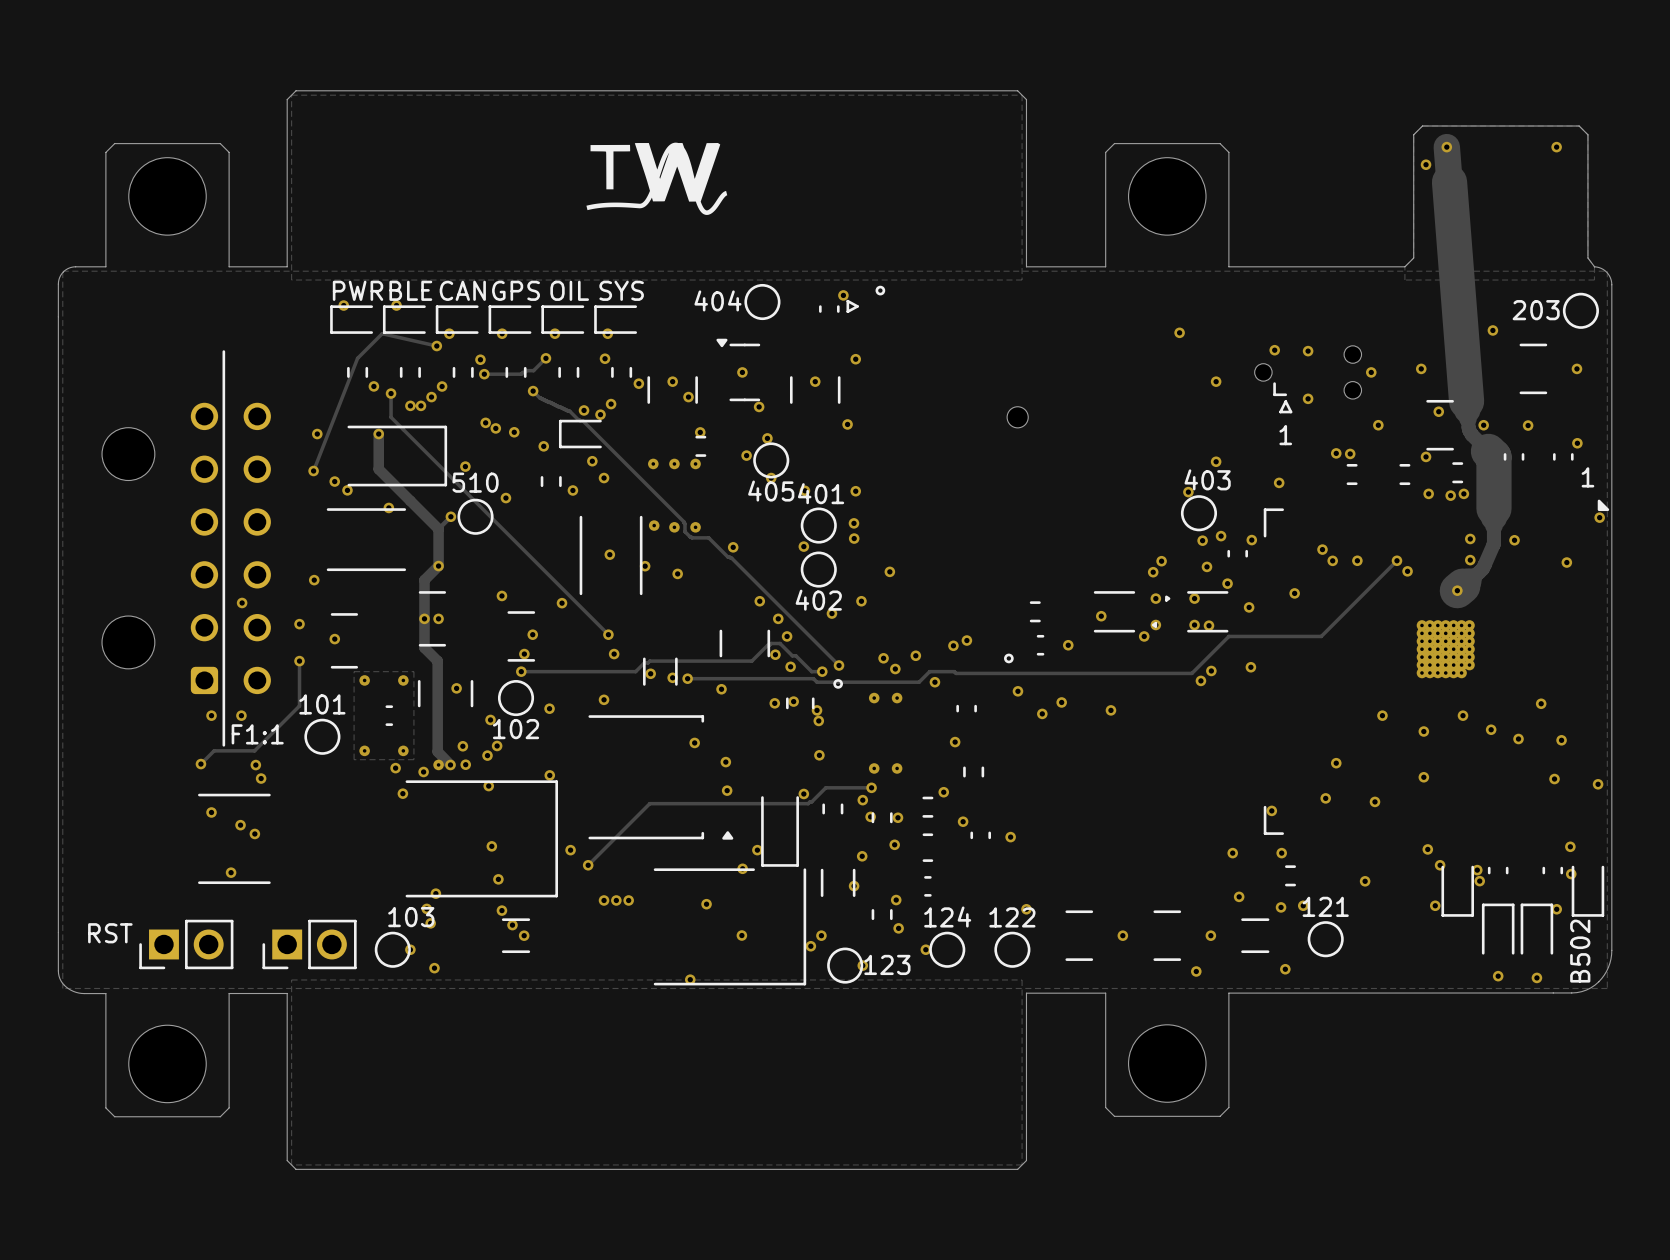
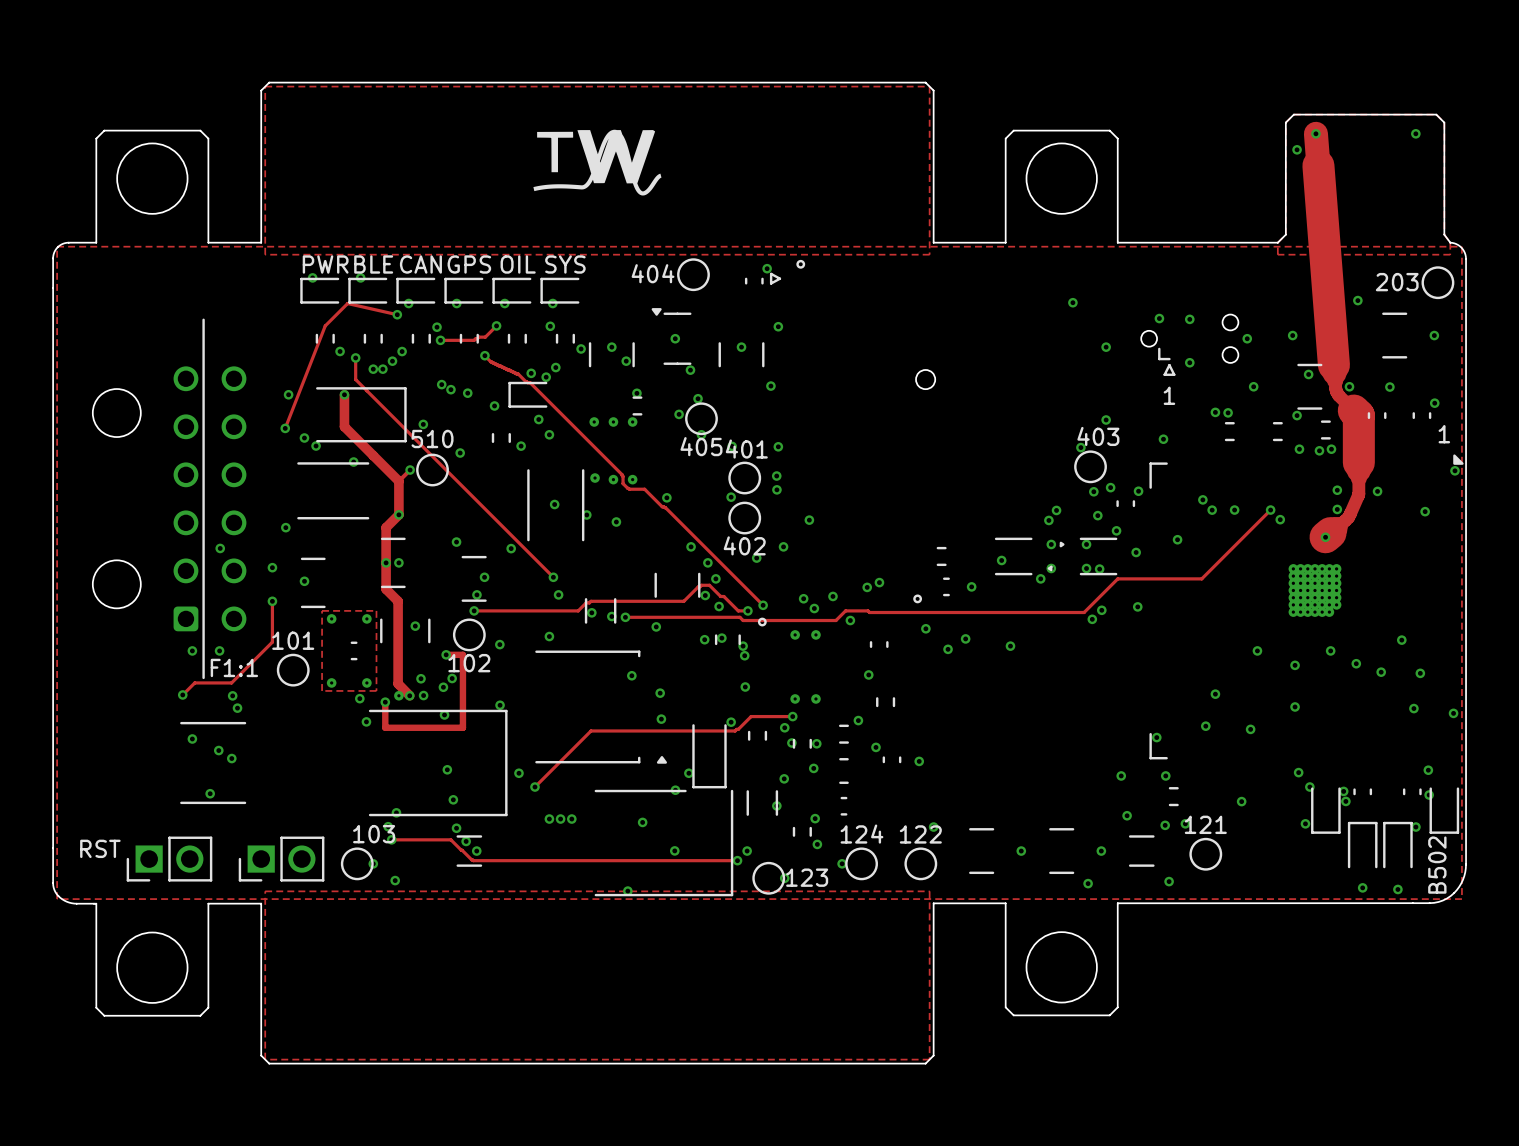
track: none -> (446, 654) (462, 654) (462, 727) (385, 727) (385, 702)
track: none -> (391, 839) (450, 839) (473, 860) (737, 860)

